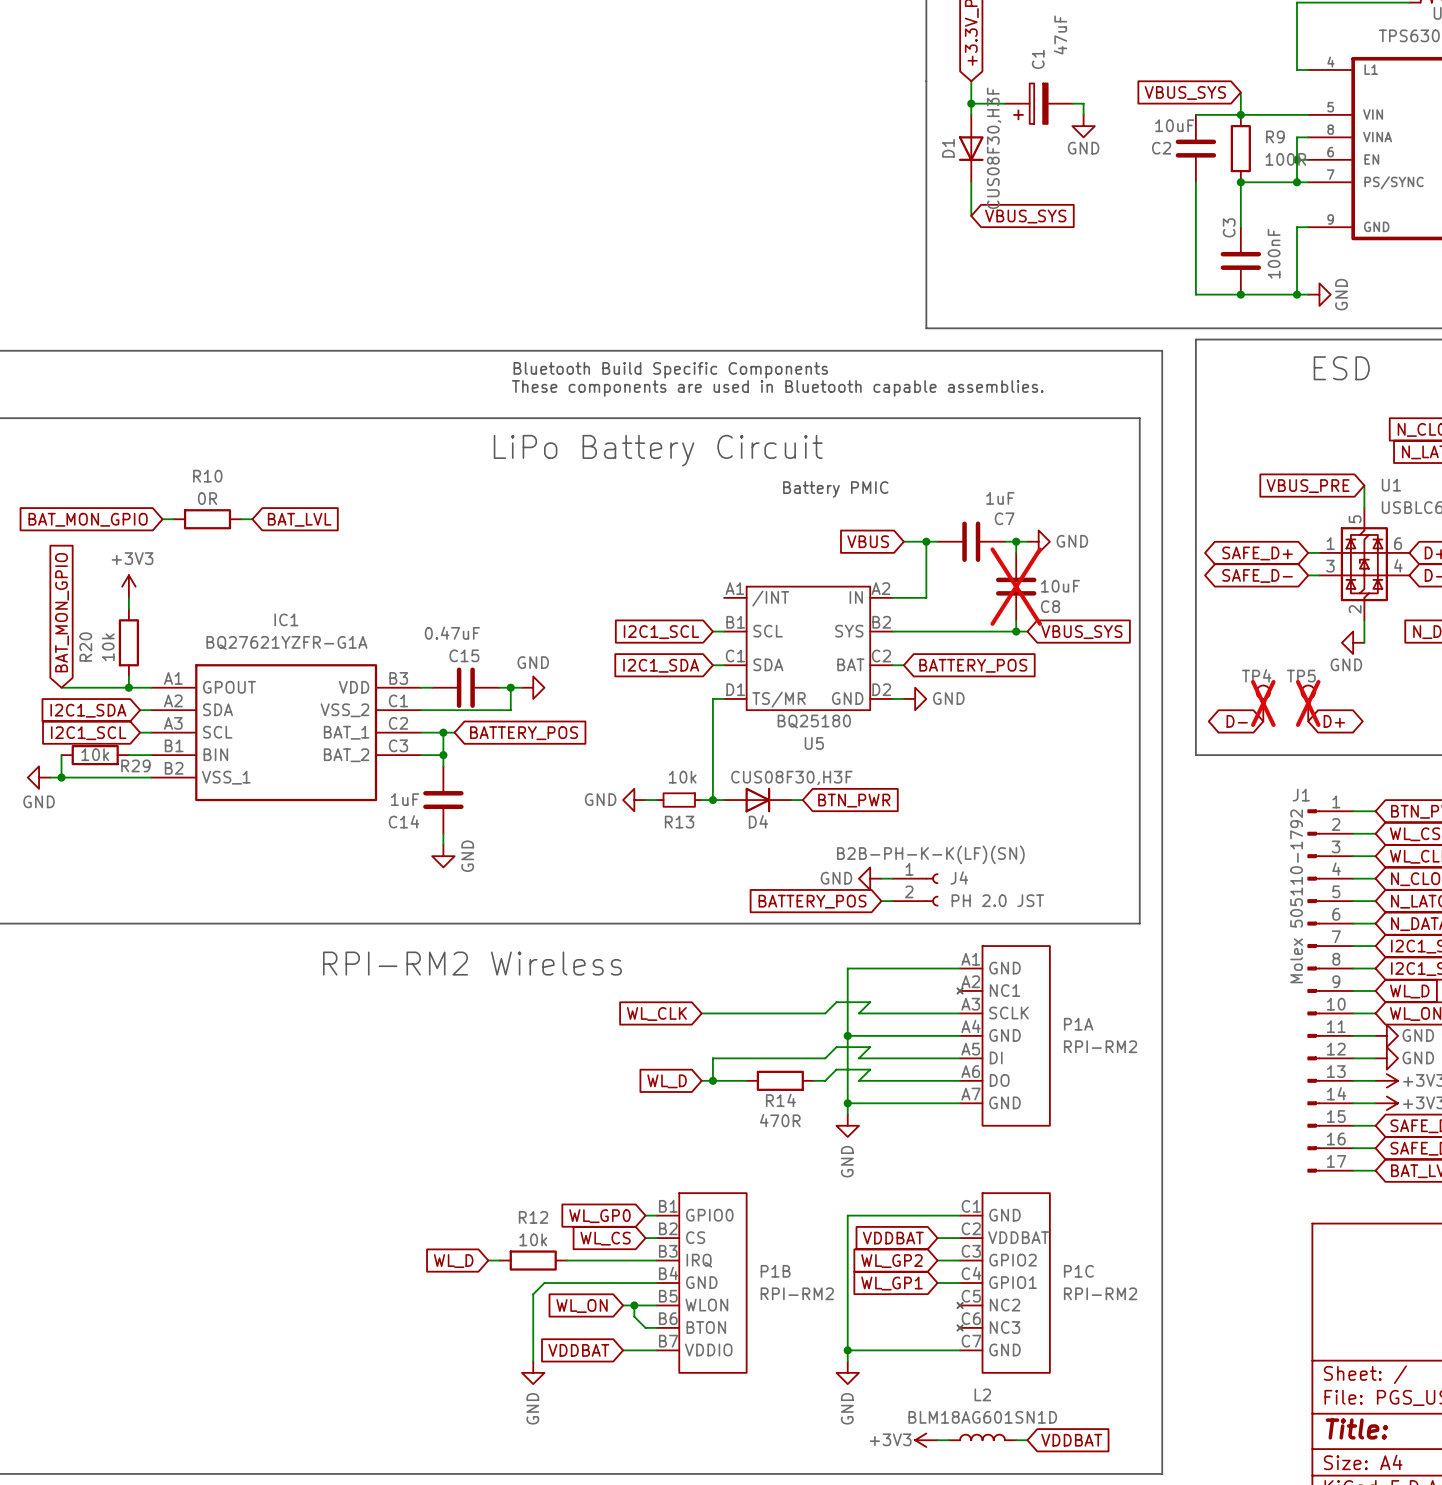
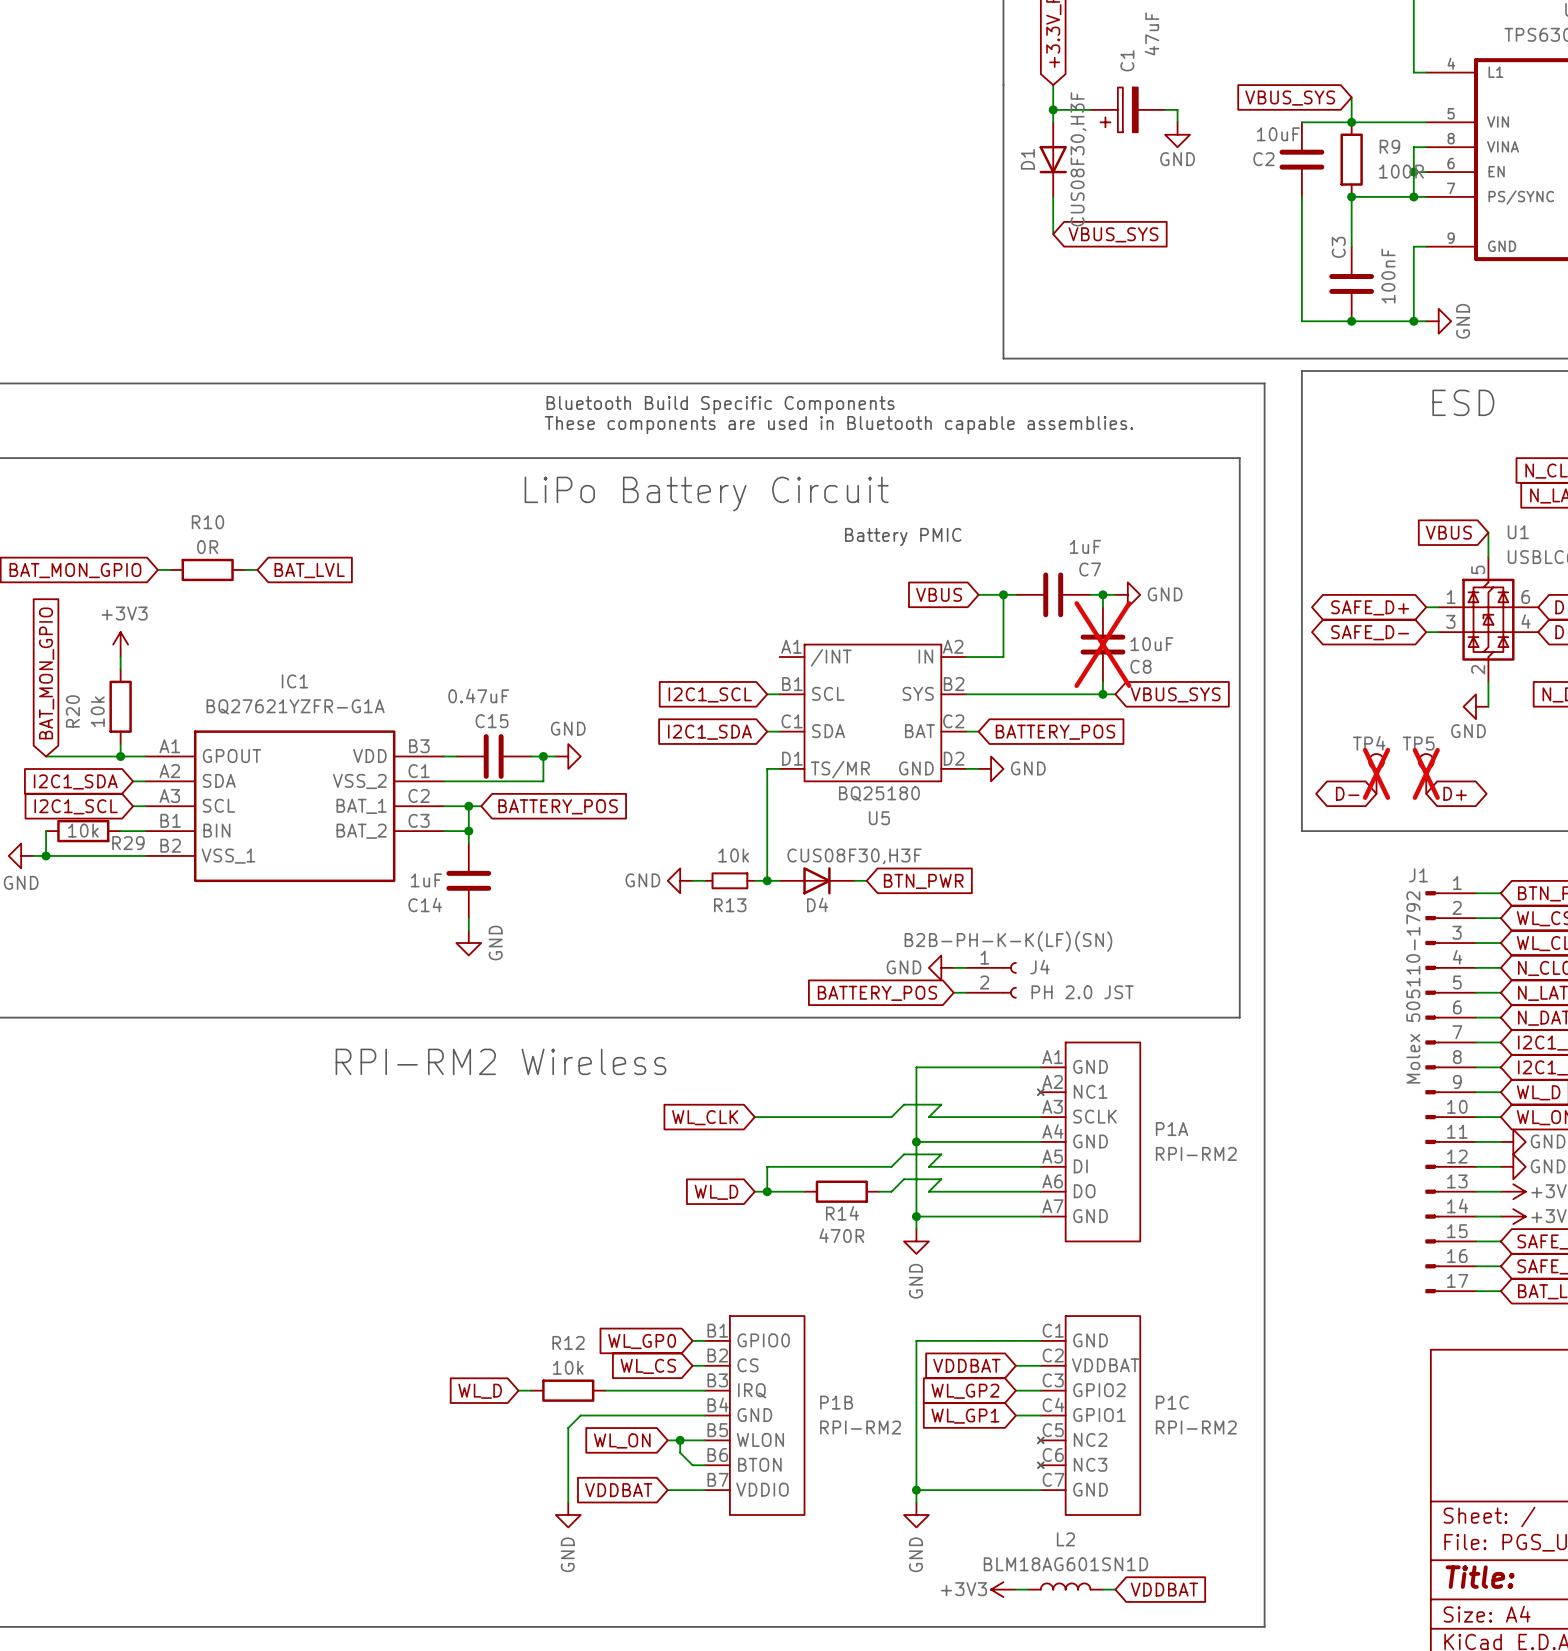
global label: VBUS_PRE (1308, 486) -> VBUS (1448, 532)

